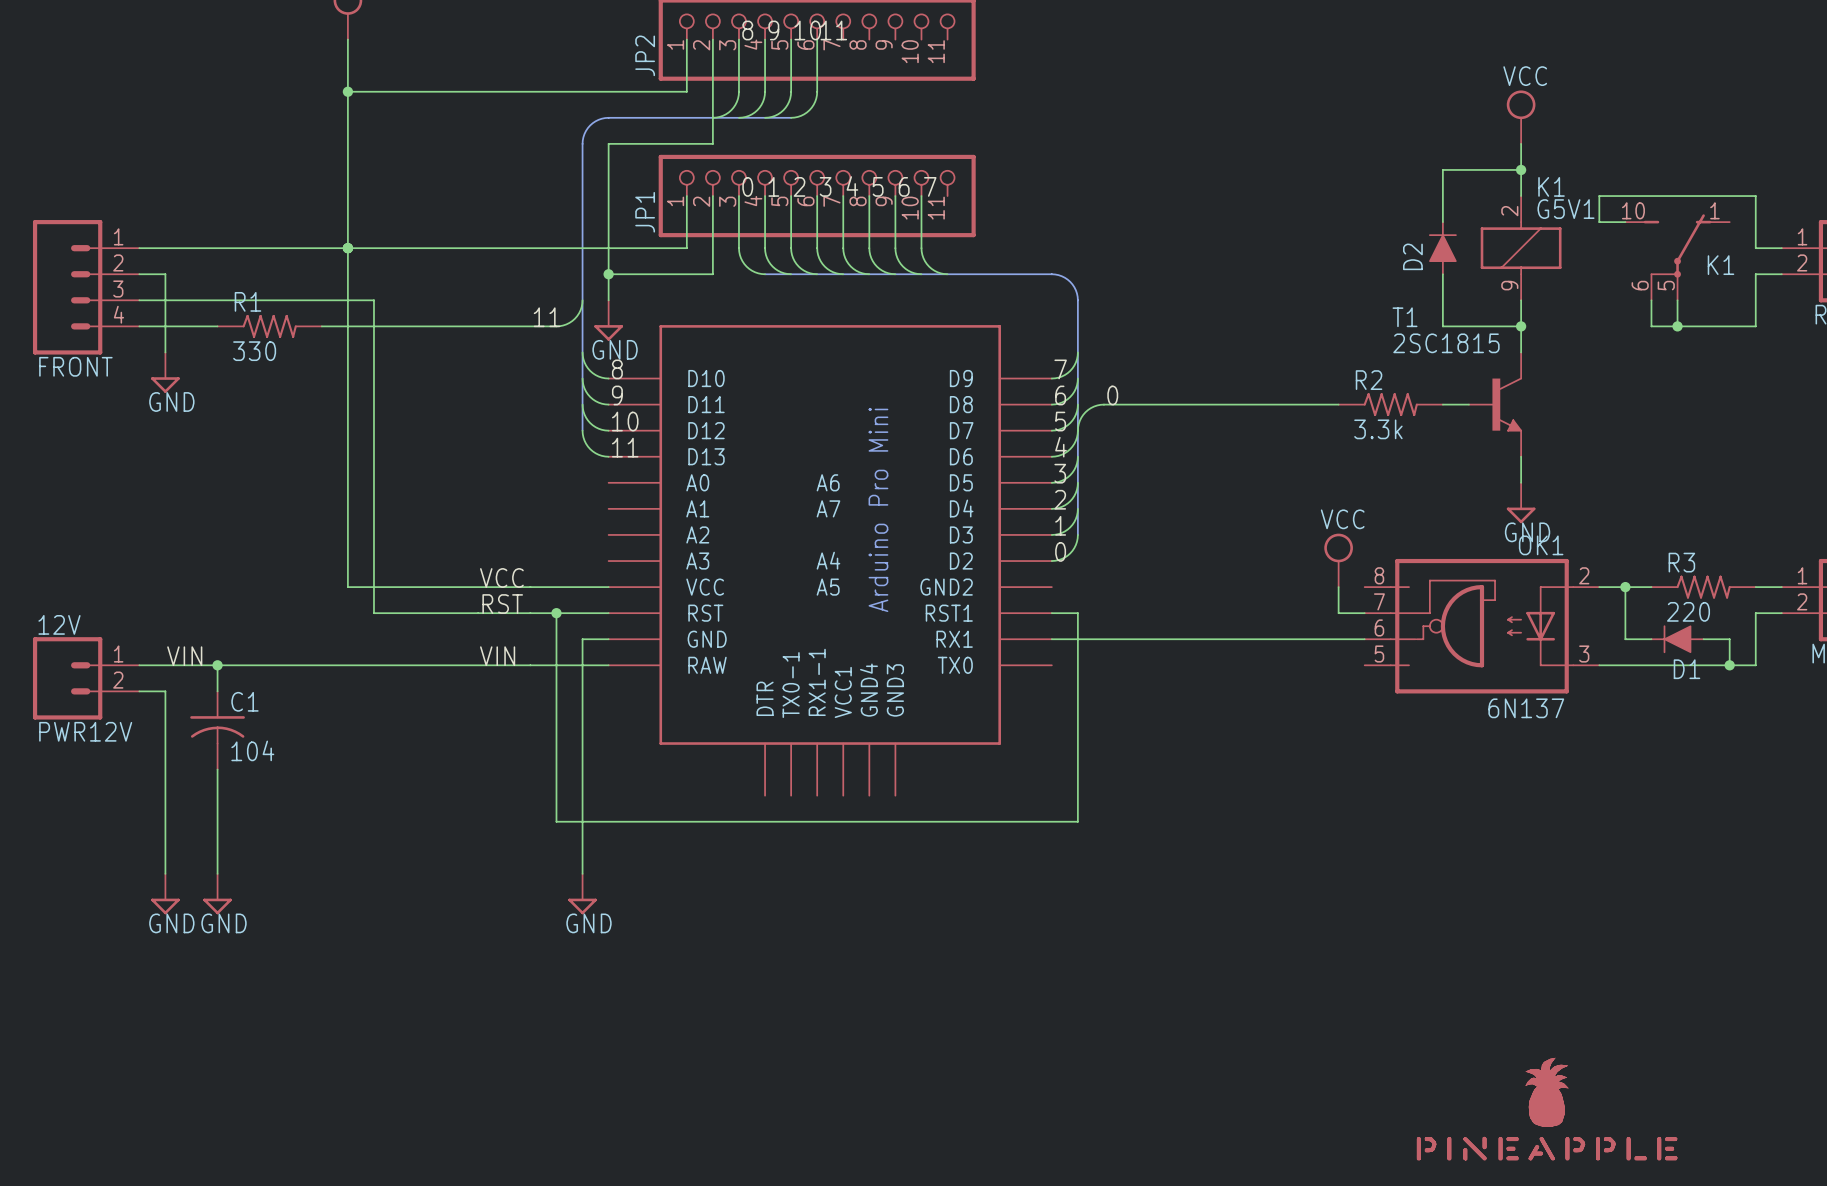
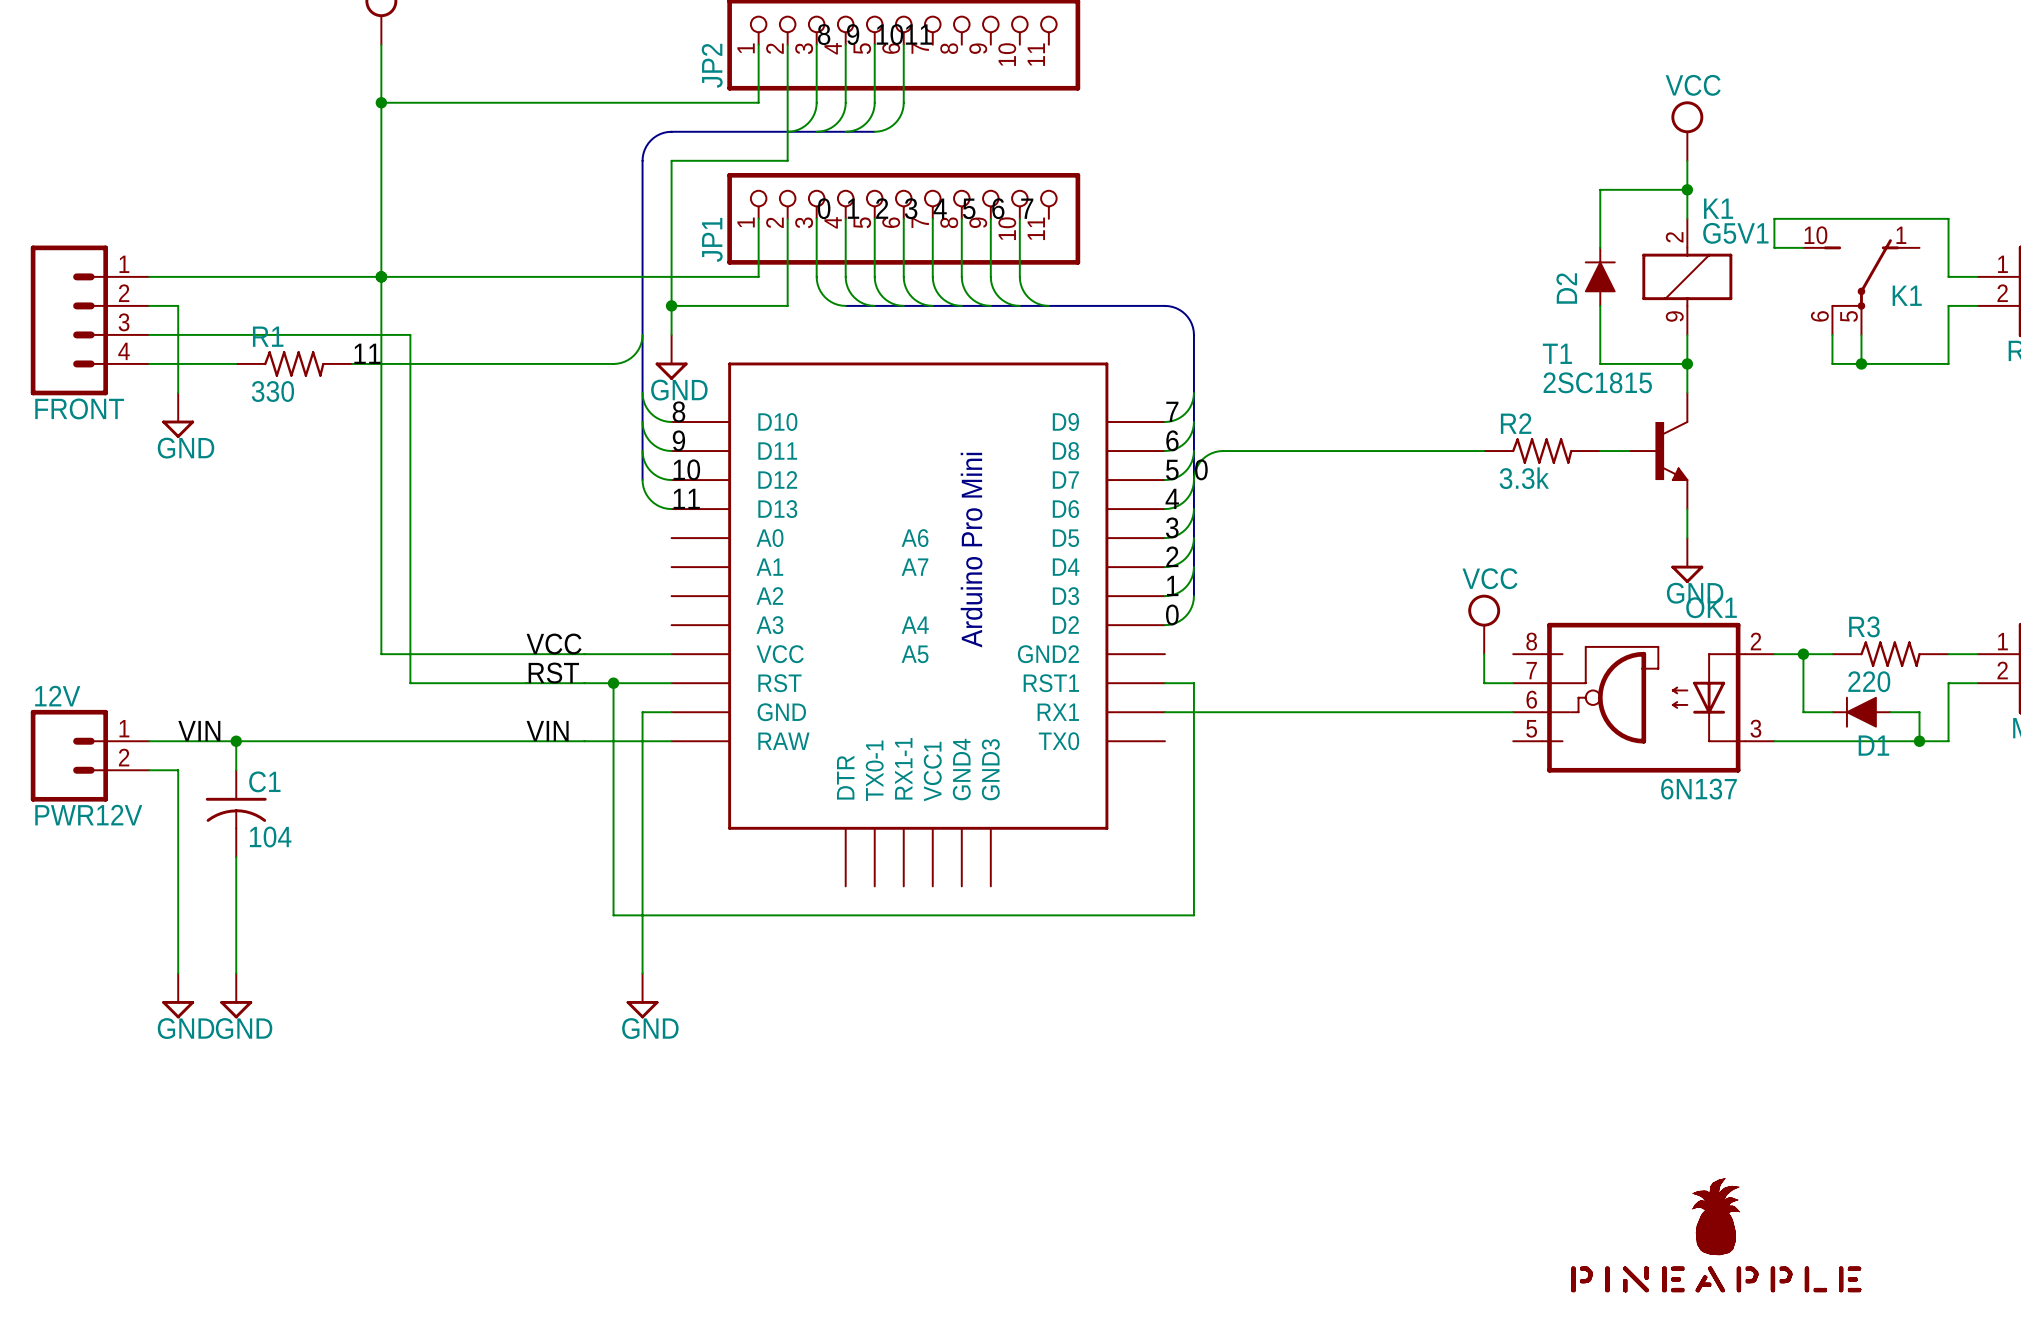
label position: 11 (547, 317) -> 11 (367, 353)
label position: 0 (1112, 395) -> 0 (1201, 469)

